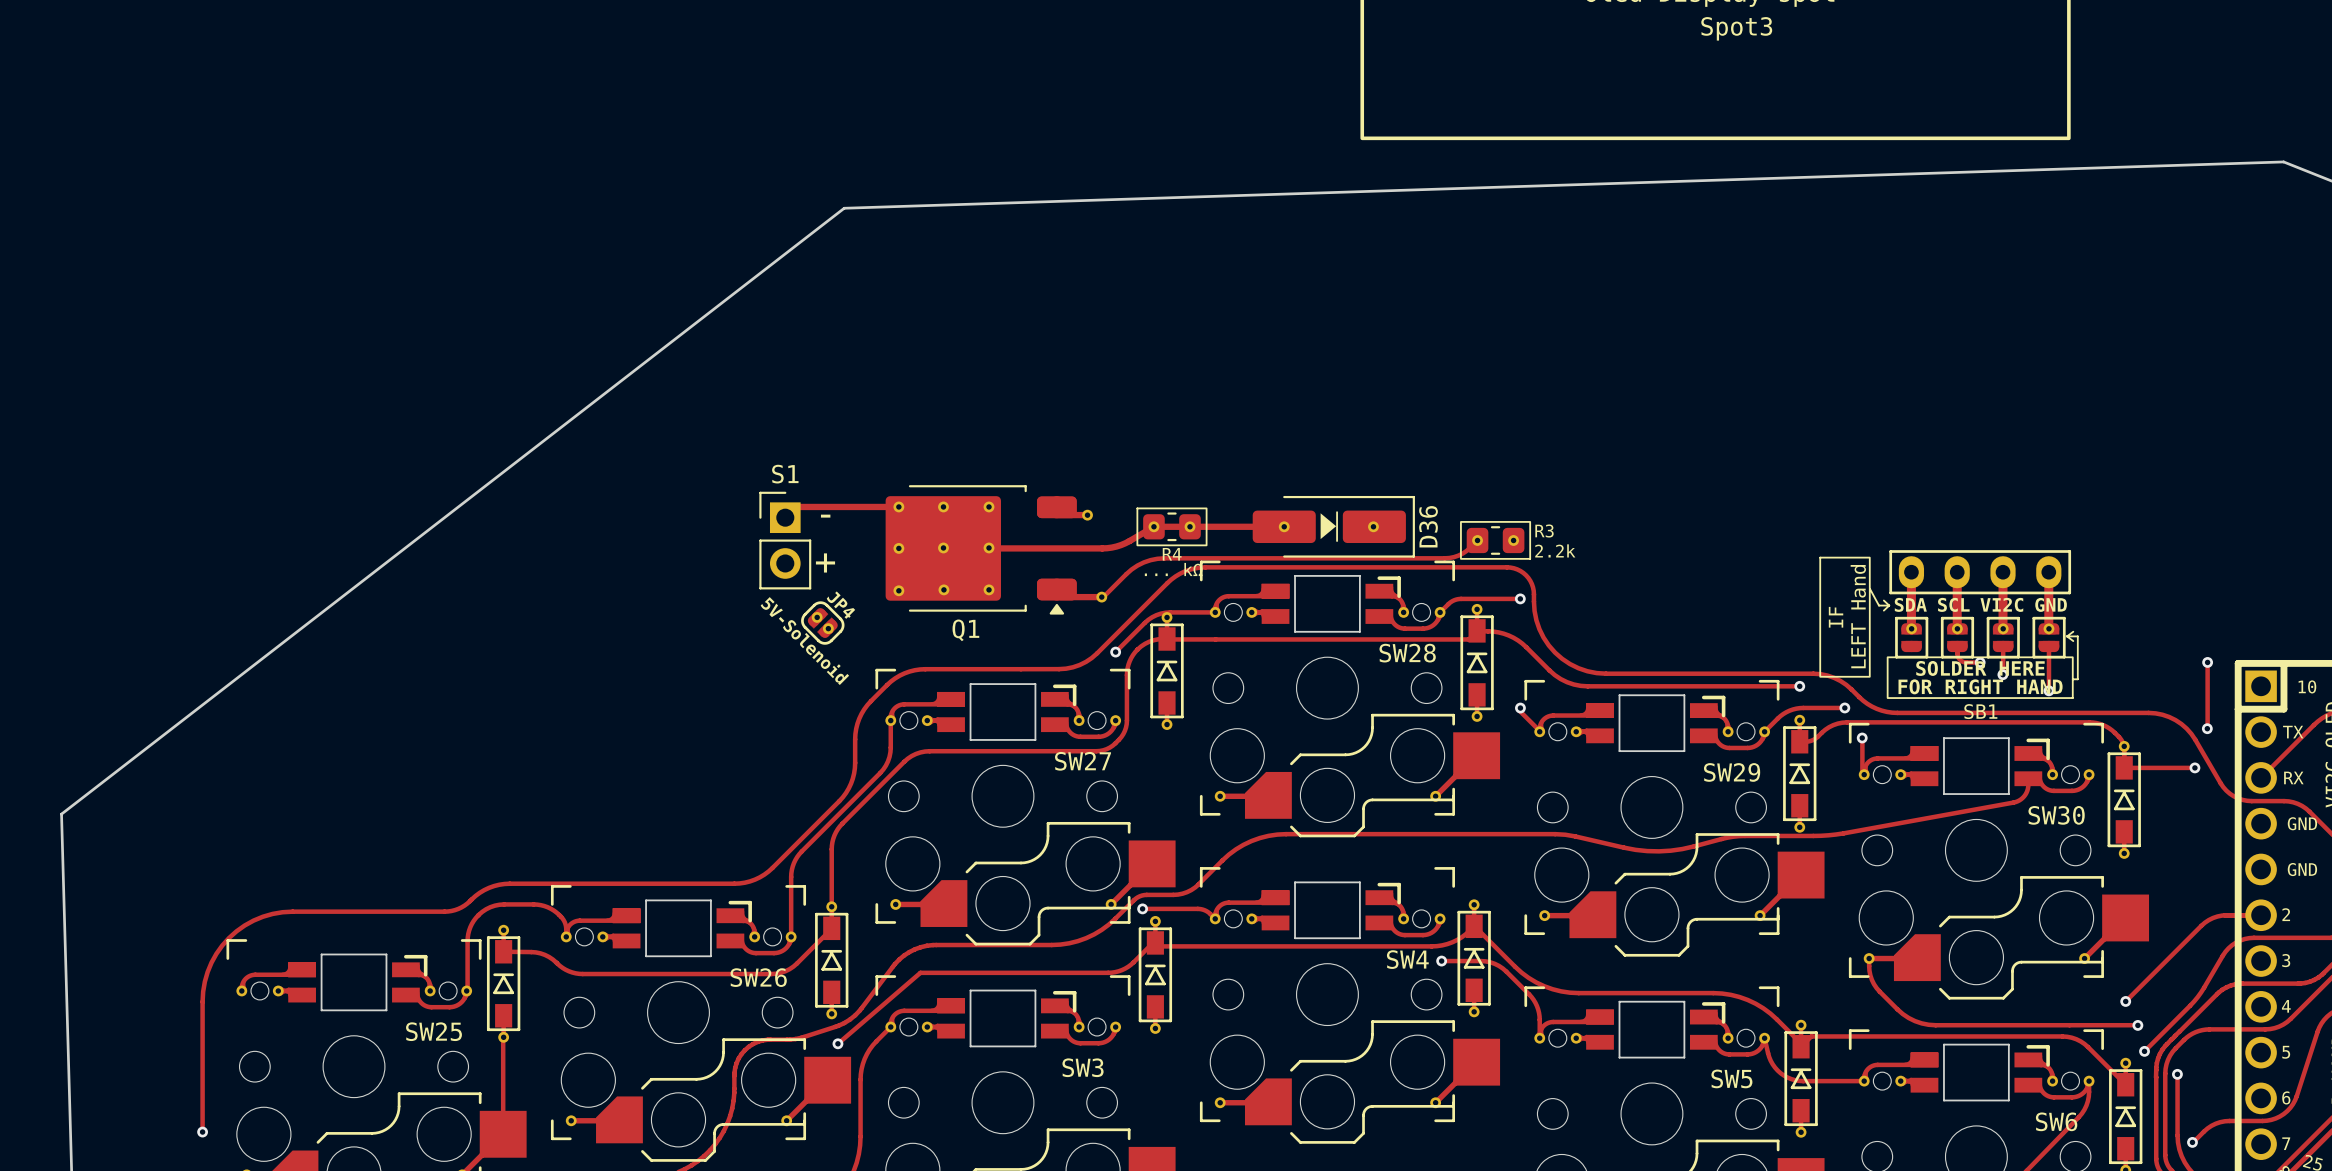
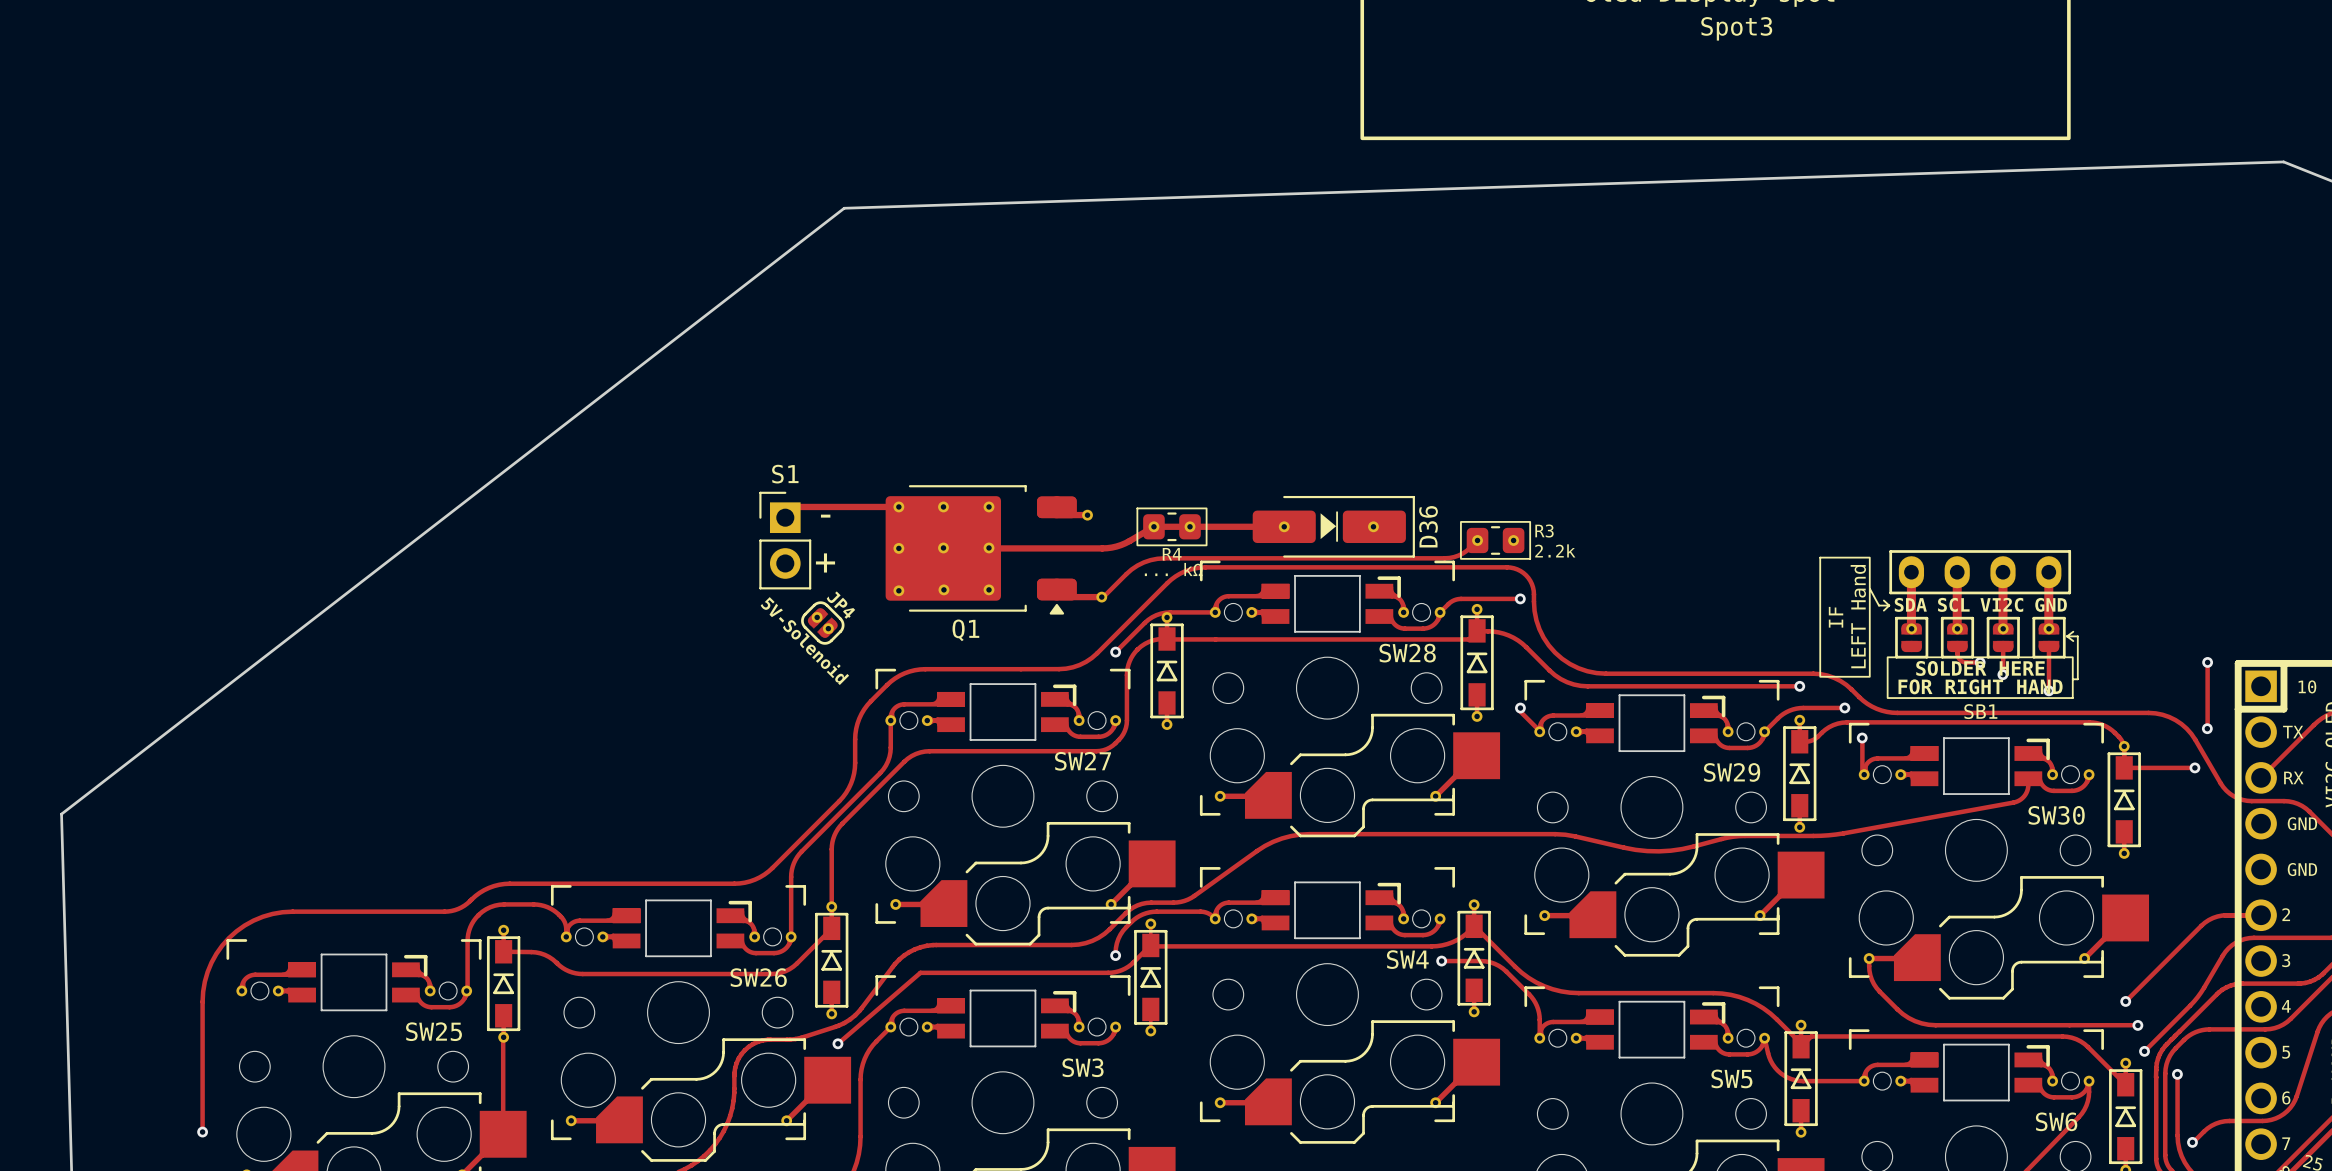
track: (1309, 834) (1277, 834) (1251, 841) (1228, 854) (1198, 884) -> none
track: (1198, 884) (1182, 893) (1139, 896) (1108, 924) (1094, 934) (1077, 941) (1051, 945) -> (1309, 834) (1291, 836) (1264, 845) (1187, 899) (1177, 902) (1146, 902) (1137, 905) (1129, 910) (1104, 933) (1092, 940) (1078, 944) (1051, 945)
track: (1142, 908) (1199, 908) (1206, 911) (1213, 916) -> (1115, 955) (1116, 943) (1120, 934) (1133, 919) (1142, 914) (1156, 911) (1200, 911) (1213, 916)
via position: (1142, 908) -> (1115, 955)
part footprint: [1138, 915, 1173, 1034] -> [1134, 918, 1168, 1037]

